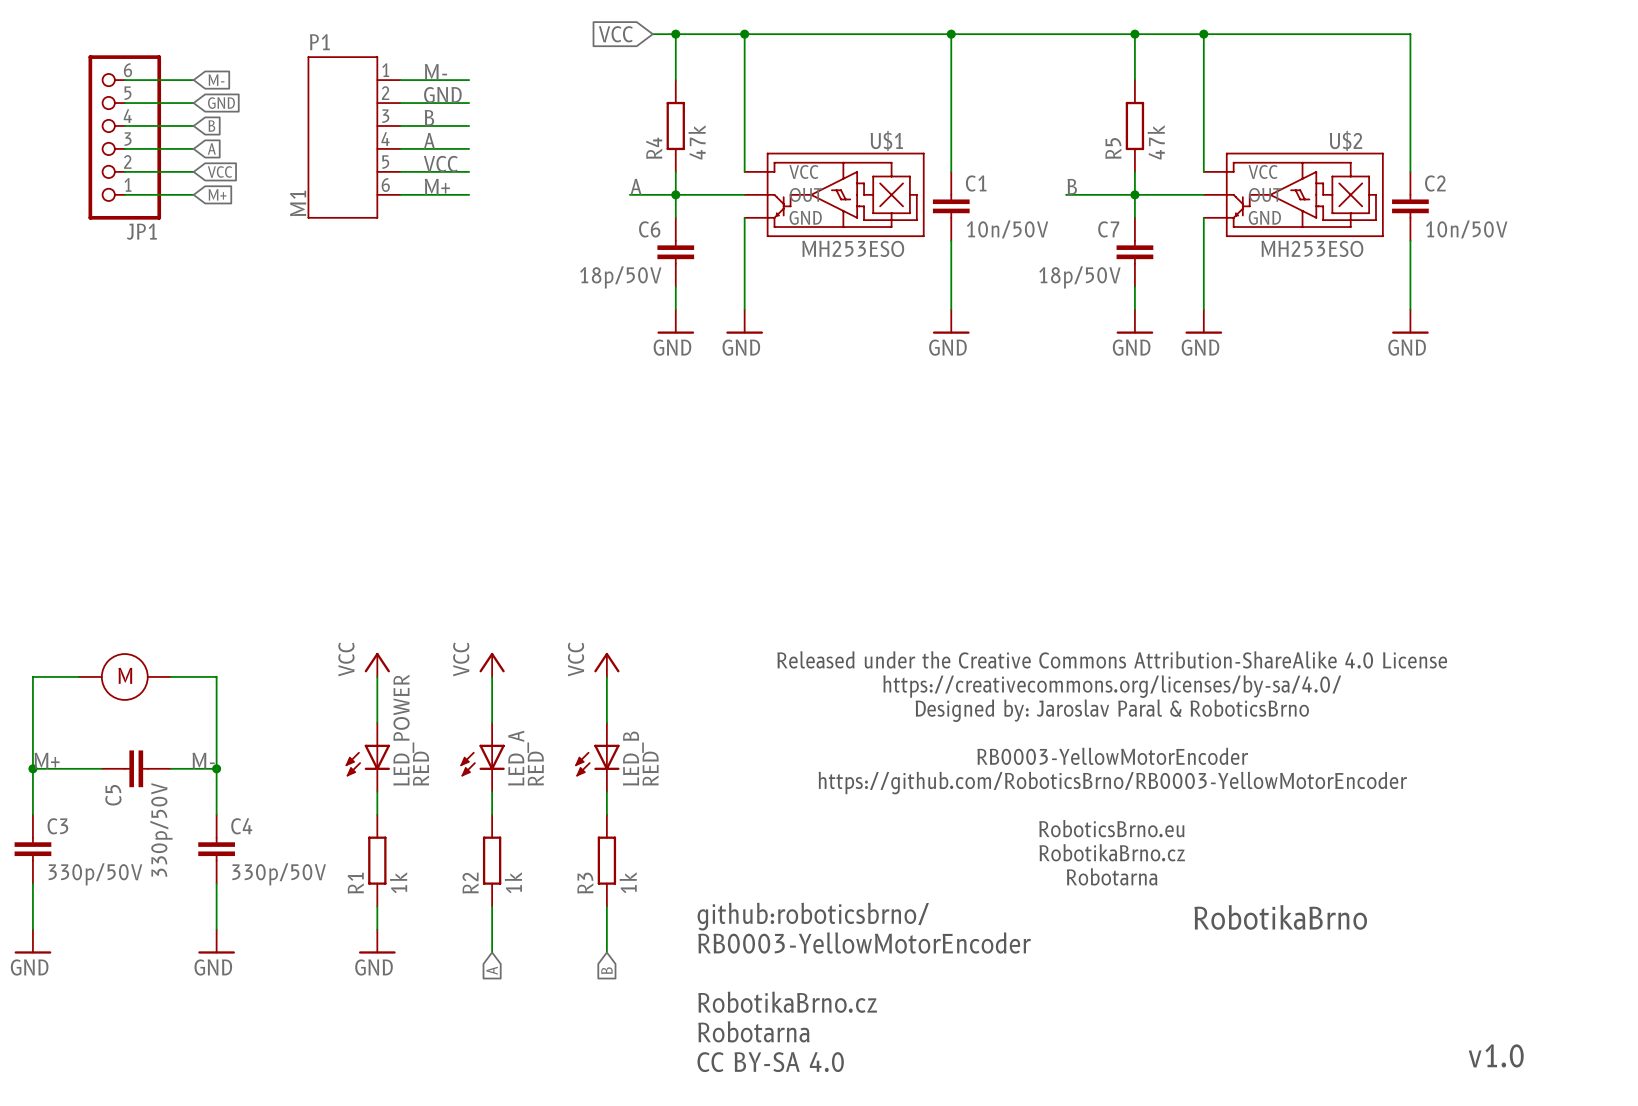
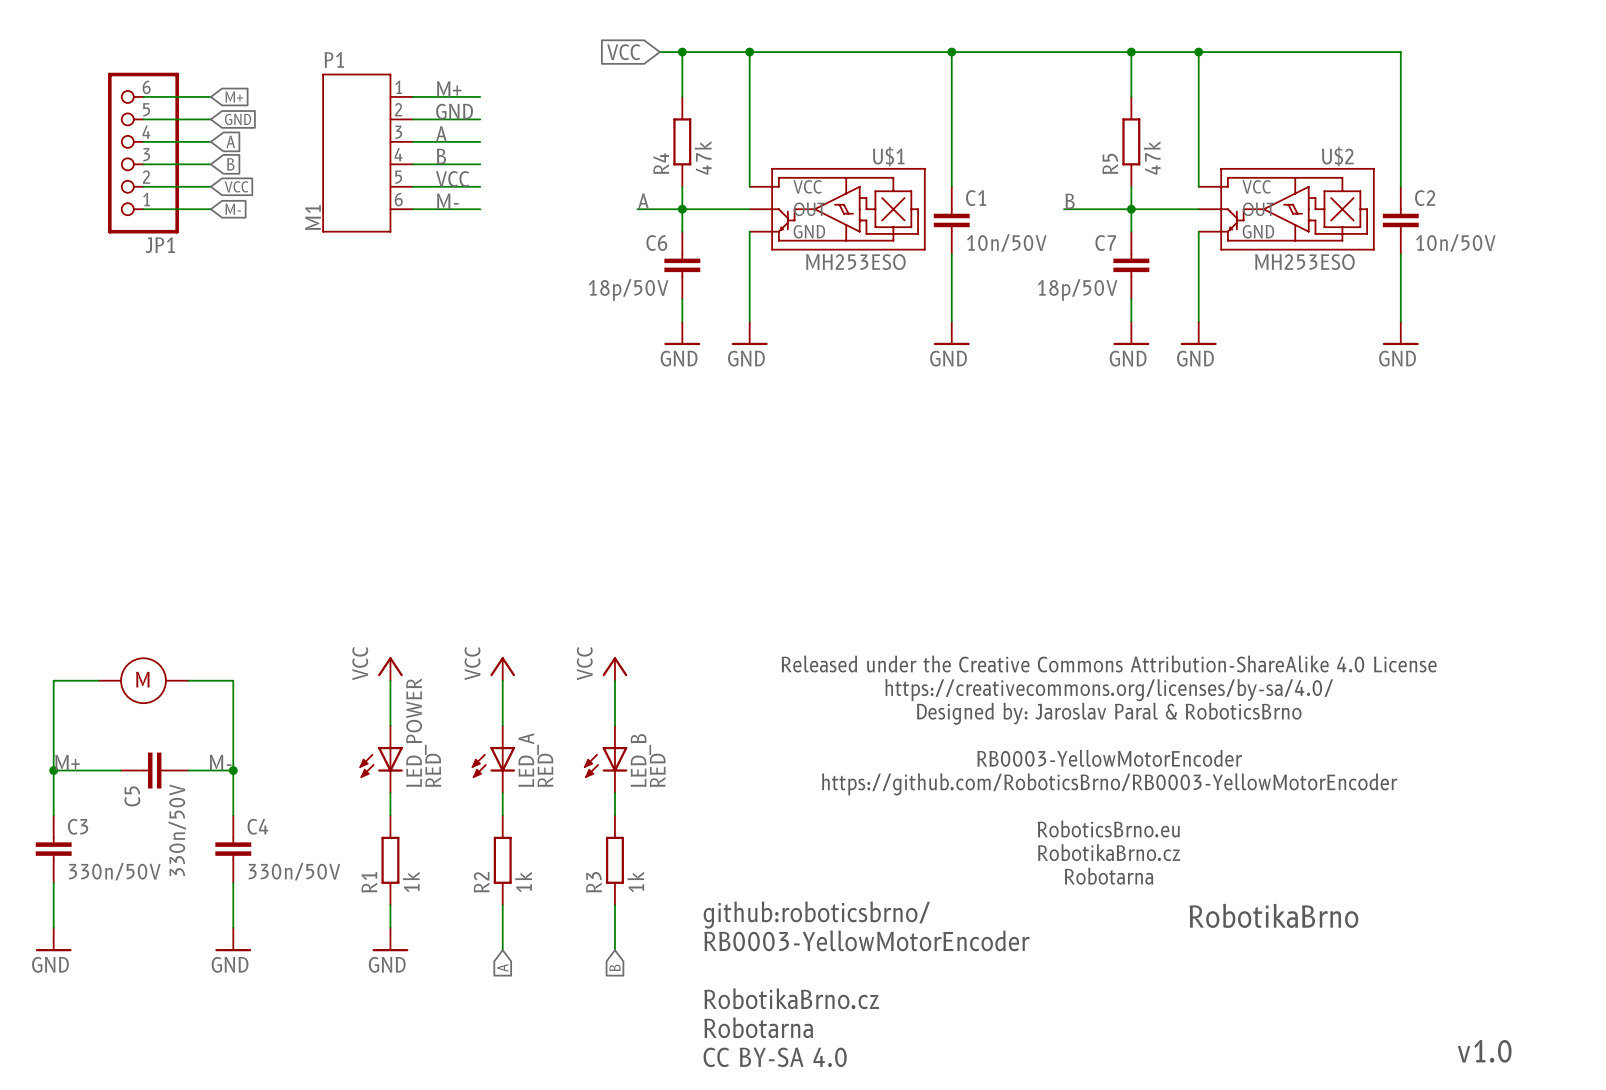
label: M- (435, 72) -> M+ (449, 89)
global label: M- (216, 80) -> M+ (234, 96)
label: B (429, 118) -> A (441, 134)
global label: B (211, 126) -> A (230, 141)
label: A (429, 140) -> B (441, 156)
global label: A (211, 148) -> B (230, 164)
label: M+ (437, 186) -> M- (447, 201)
global label: M+ (217, 194) -> M- (233, 209)
part flip: as is (124, 676) -> left-right (143, 680)
C5 value: 330p/50V (161, 829) -> 330n/50V (177, 830)
C3 value: 330p/50V (95, 874) -> 330n/50V (114, 871)
C4 value: 330p/50V (279, 874) -> 330n/50V (294, 871)

